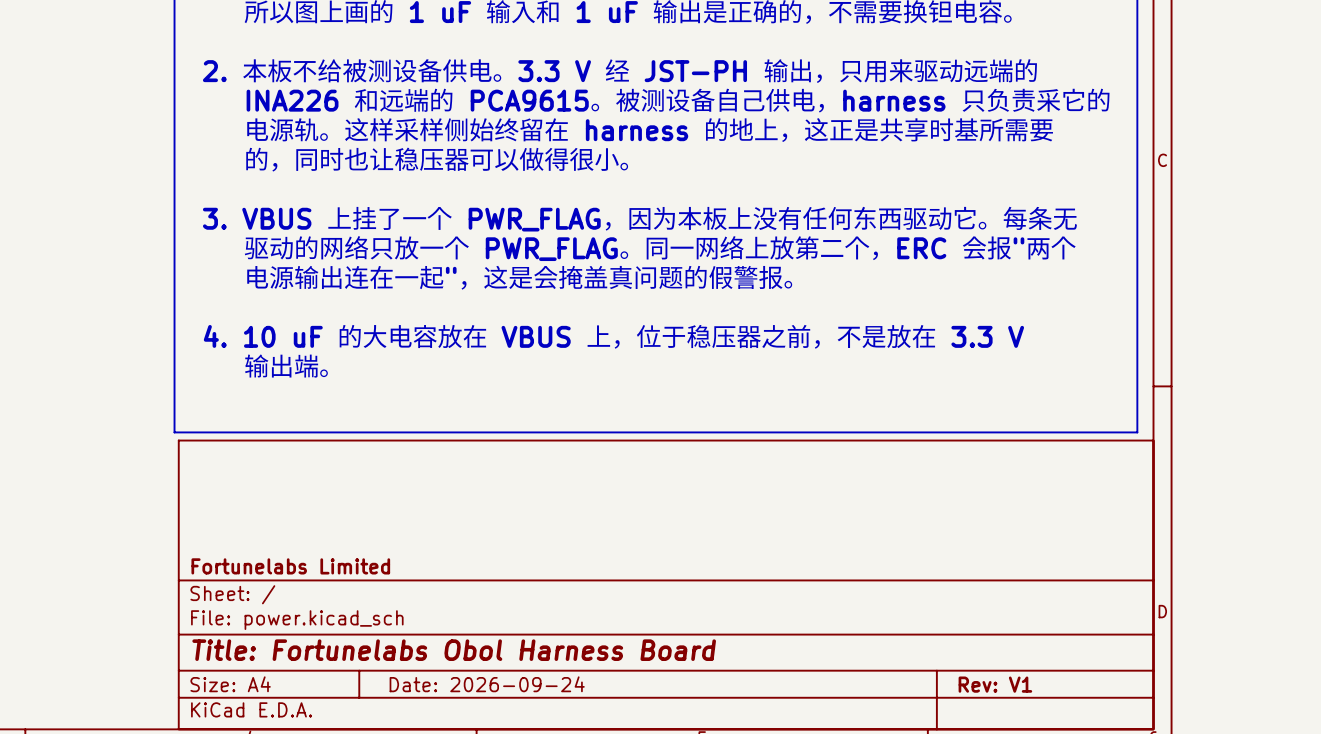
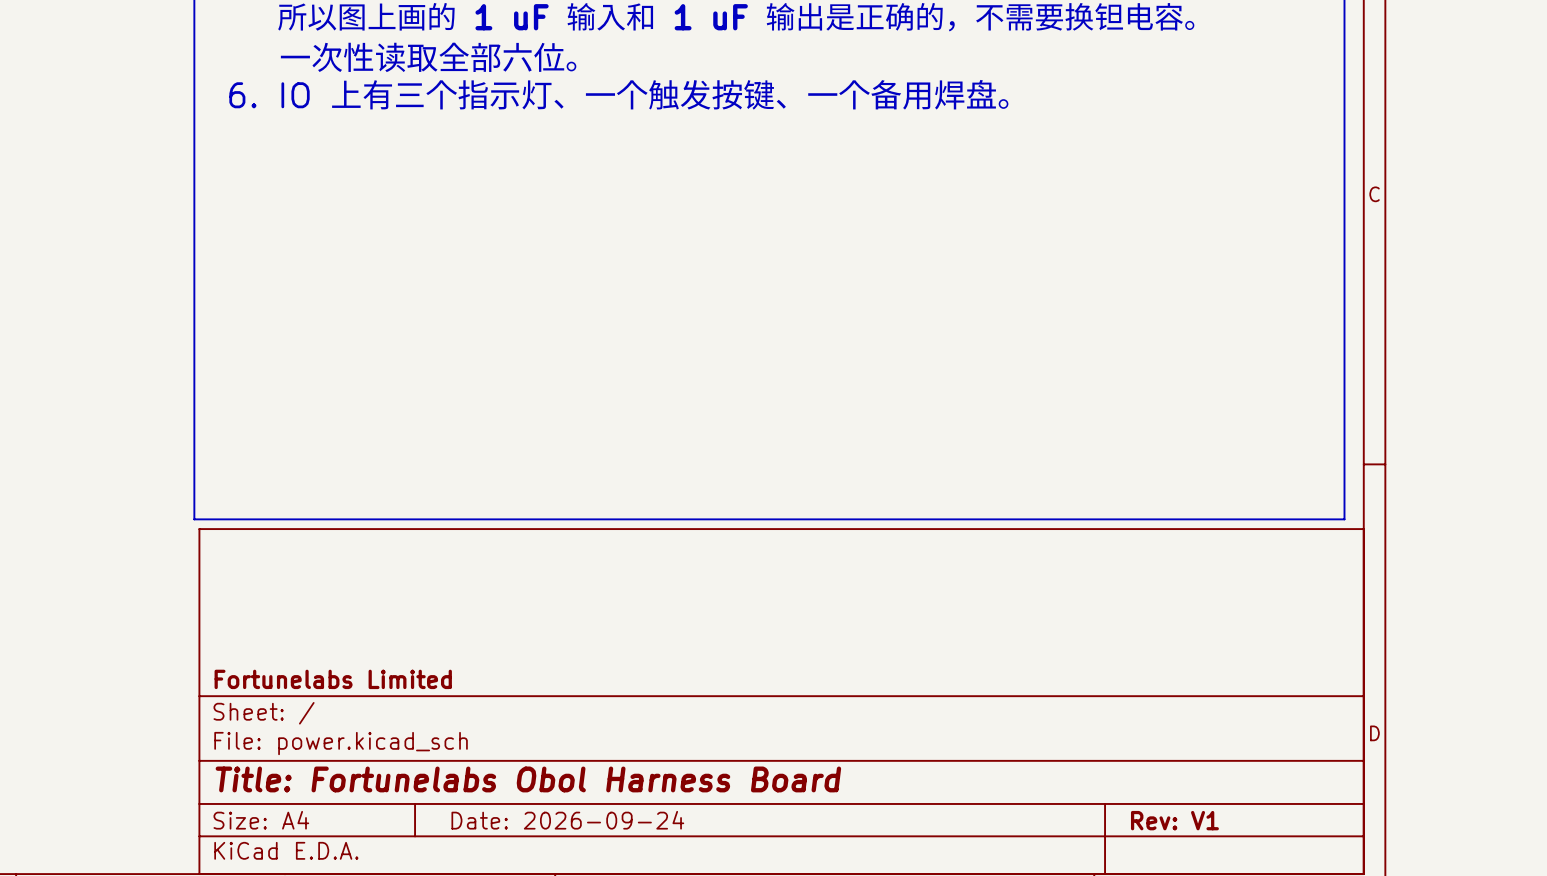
text: none -> 一次性读取全部六位。 (428, 57)
text: 2. 本板不给被测设备供电。3.3 V 经 JST-PH 输出，只用来驱动远端的 (620, 71) -> 6. IO 上有三个指示灯、一个触发按键、一个备用焊盘。 (619, 94)
text: INA226 和远端的 PCA9615。被测设备自己供电，harness 只负责采它的 (678, 100) -> none
text: 电源轨。这样采样侧始终留在 harness 的地上，这正是共享时基所需要 (650, 130) -> none
text: 的，同时也让稳压器可以做得很小。 (437, 159) -> none
text: 3. VBUS 上挂了一个 PWR_FLAG，因为本板上没有任何东西驱动它。每条无 (640, 218) -> none
text: 驱动的网络只放一个 PWR_FLAG。同一网络上放第二个，ERC 会报"两个 (660, 248) -> none
text: 电源输出连在一起"，这是会掩盖真问题的假警报。 (519, 277) -> none
text: 4. 10 uF 的大电容放在 VBUS 上，位于稳压器之前，不是放在 3.3 V (613, 336) -> none
text: 输出端。 (286, 366) -> none

